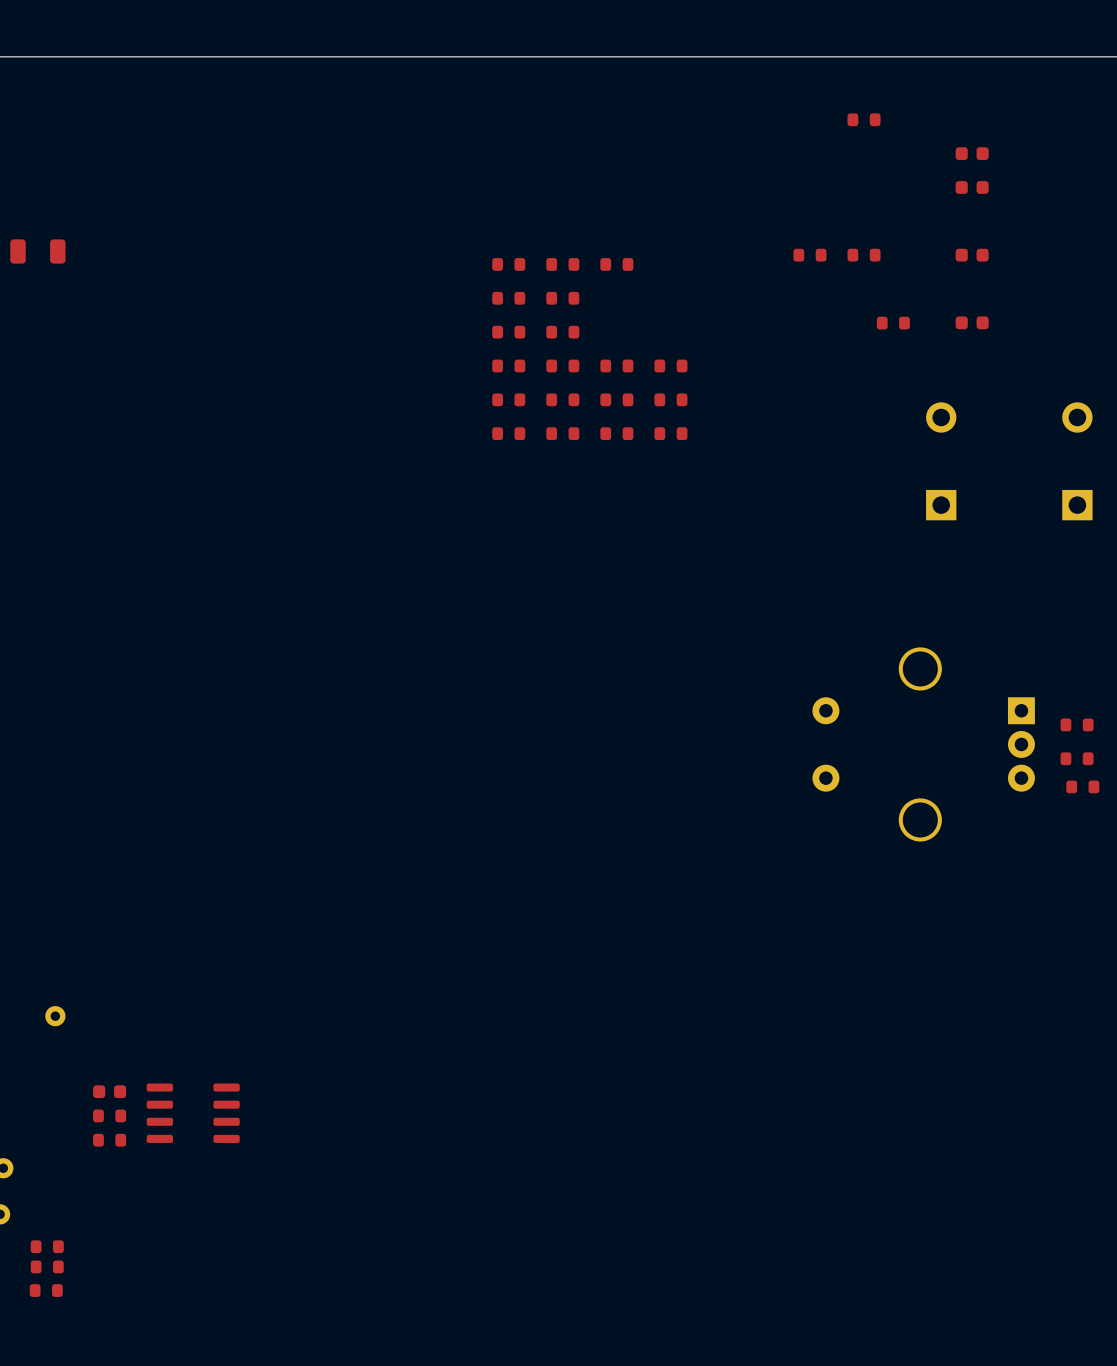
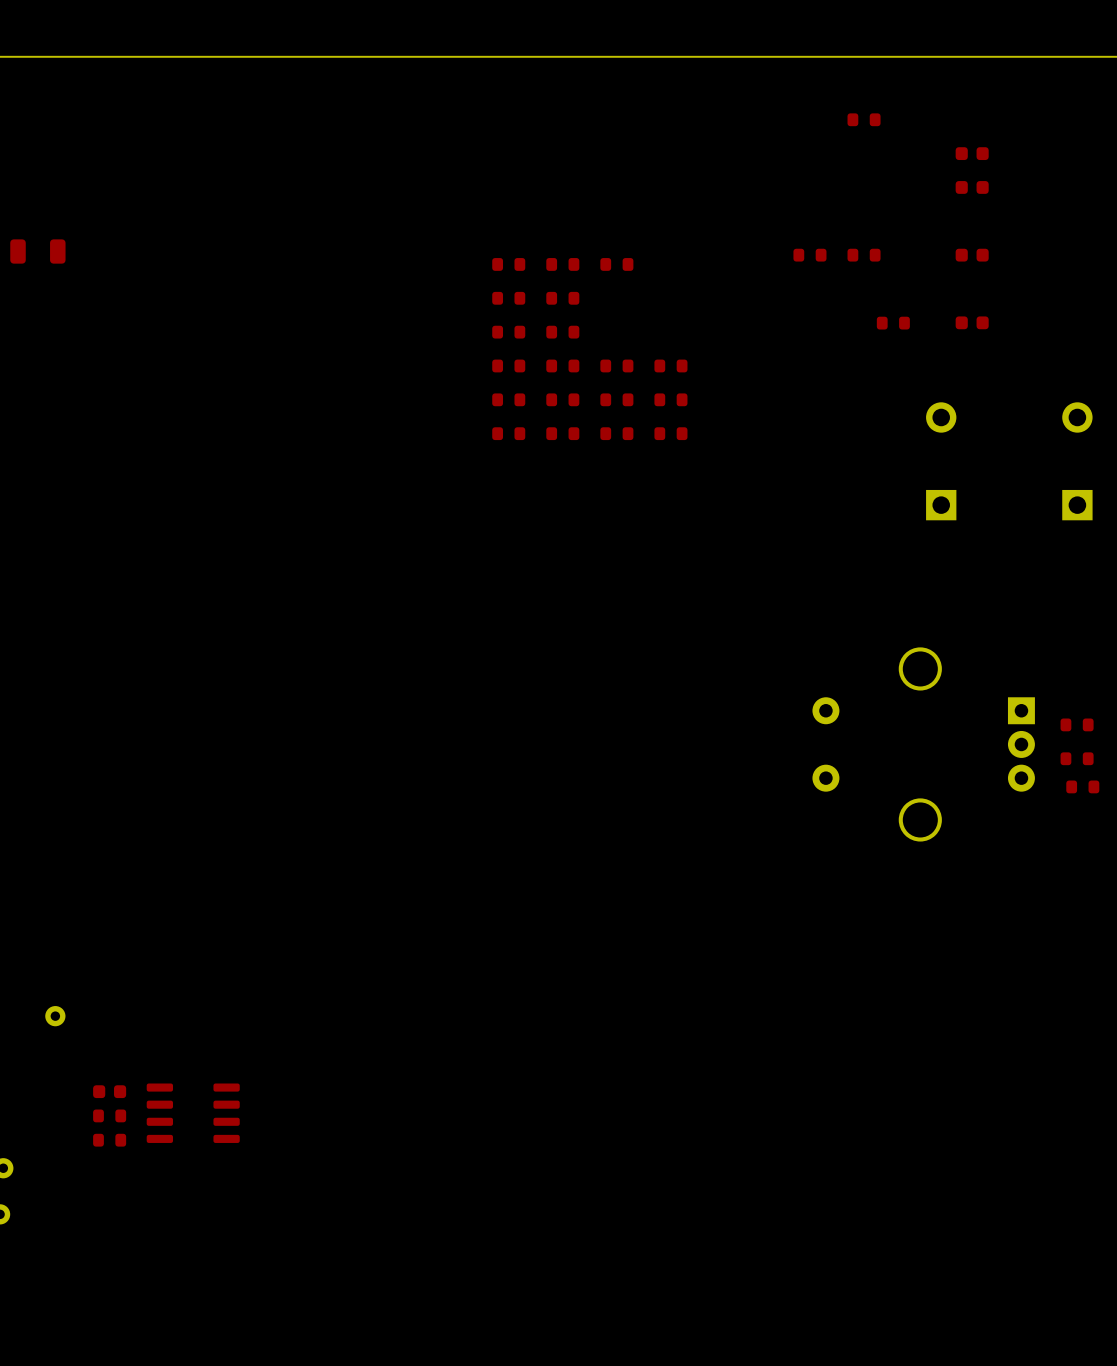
part: (47, 1246) -> none
part: (47, 1266) -> none
part: (46, 1290) -> none

